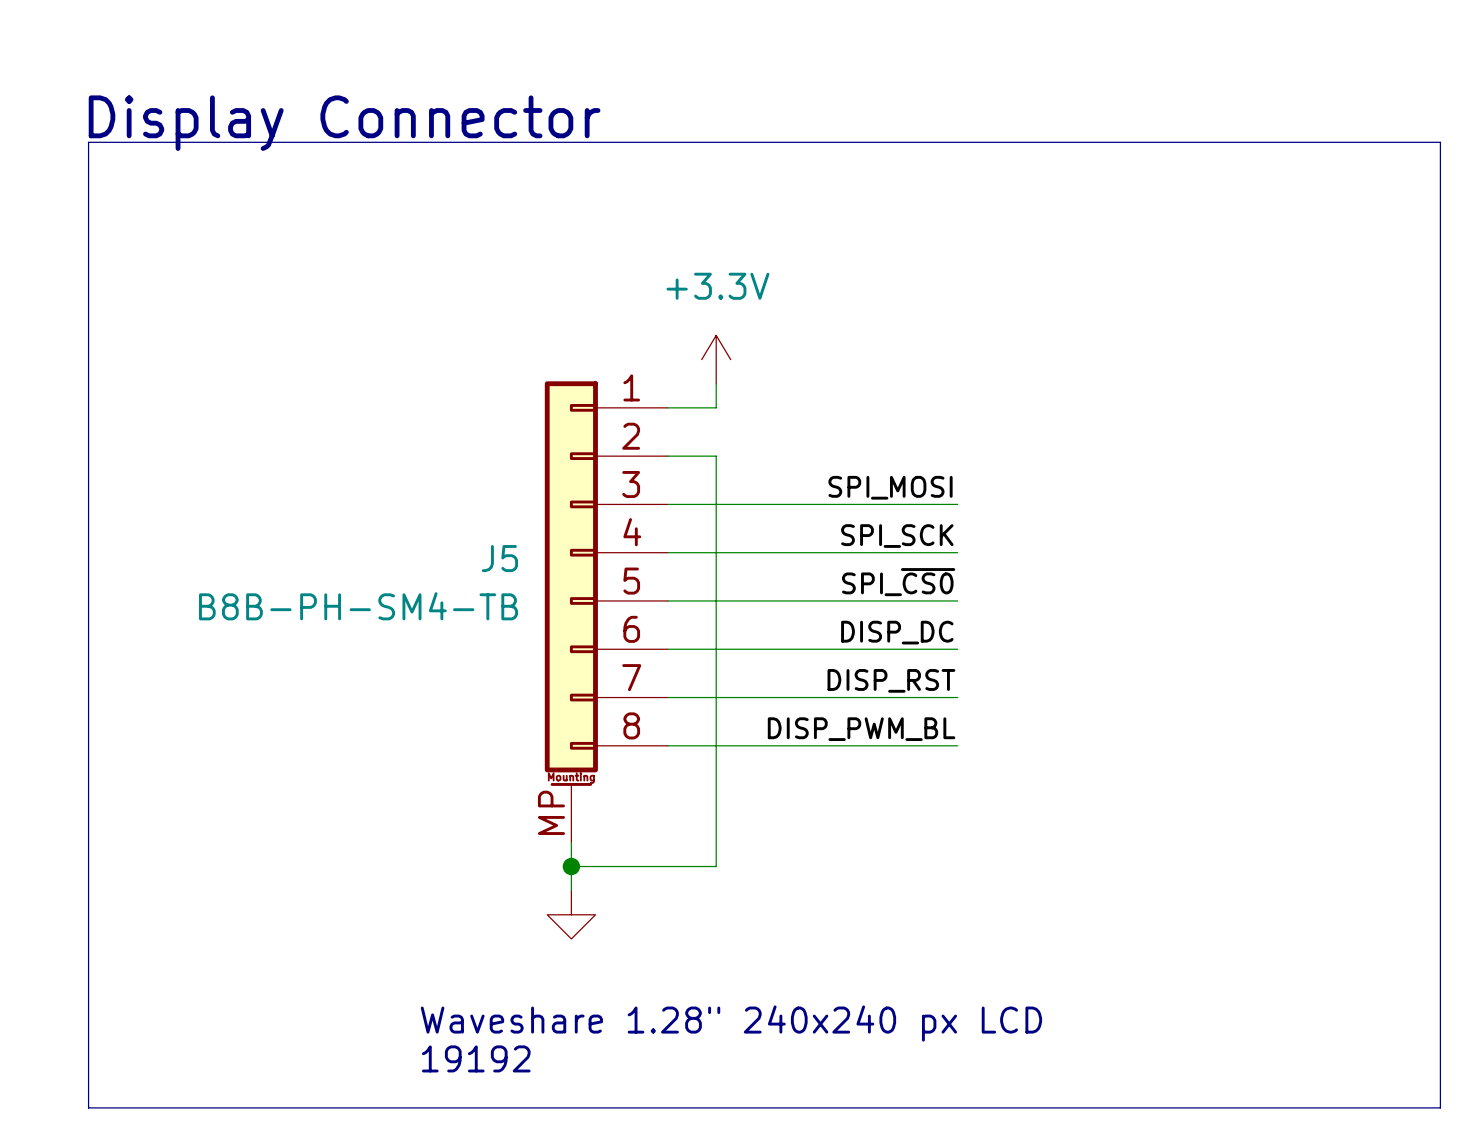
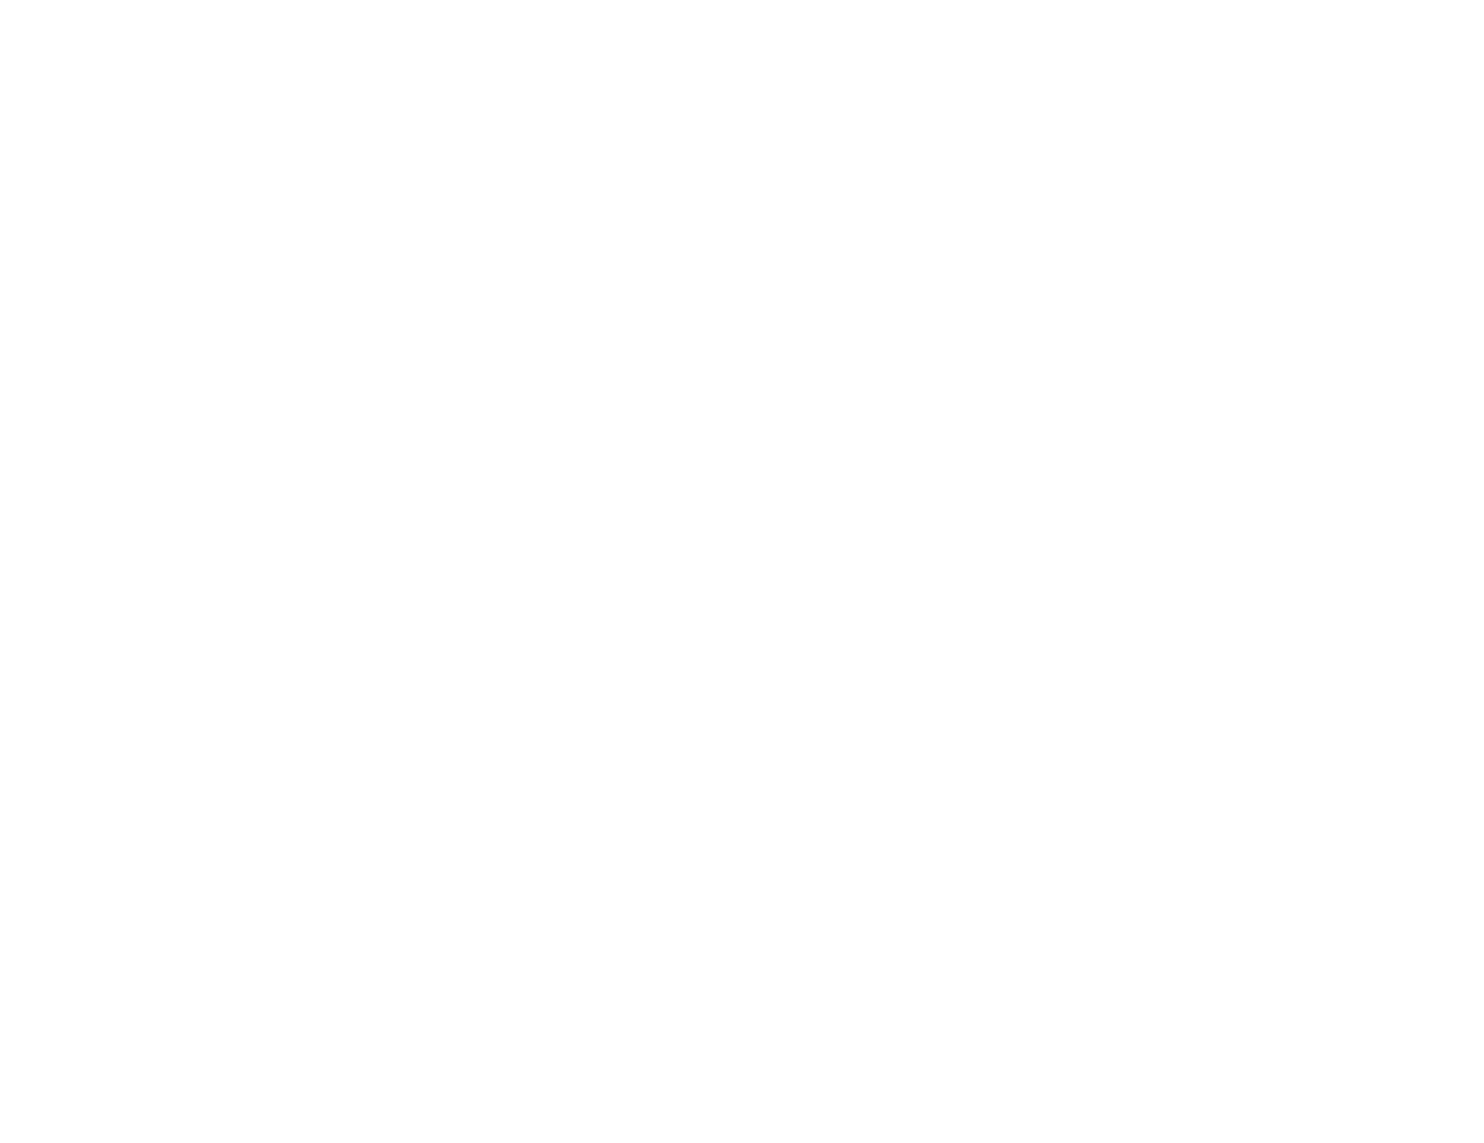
text: Display Connector (344, 123) -> none
line: (88, 142) (1440, 142) (1440, 1107) (88, 1107) (88, 142) -> none
power symbol: +3.3V (716, 359) -> none
wire: (716, 383) (716, 407) (667, 407) -> none
wire: (667, 456) (716, 456) (716, 866) (571, 866) -> none
label: SPI_MOSI (890, 487) -> none
wire: (667, 504) (957, 504) -> none
label: SPI_SCK (897, 536) -> none
wire: (667, 552) (957, 552) -> none
label: SPI_~{CS0} (898, 582) -> none
wire: (667, 600) (957, 600) -> none
J5: B8B-PH-SM4-TB (606, 611) -> none
label: DISP_DC (897, 632) -> none
wire: (667, 649) (957, 649) -> none
label: DISP_RST (891, 680) -> none
wire: (667, 697) (957, 697) -> none
label: DISP_PWM_BL (861, 729) -> none
wire: (667, 745) (957, 745) -> none
wire: (571, 842) (571, 890) -> none
junction: (571, 866) -> none
power symbol: (571, 914) -> none
text: Waveshare 1.28" 240x240 px LCD (731, 1023) -> none
text: 19192 (476, 1058) -> none

